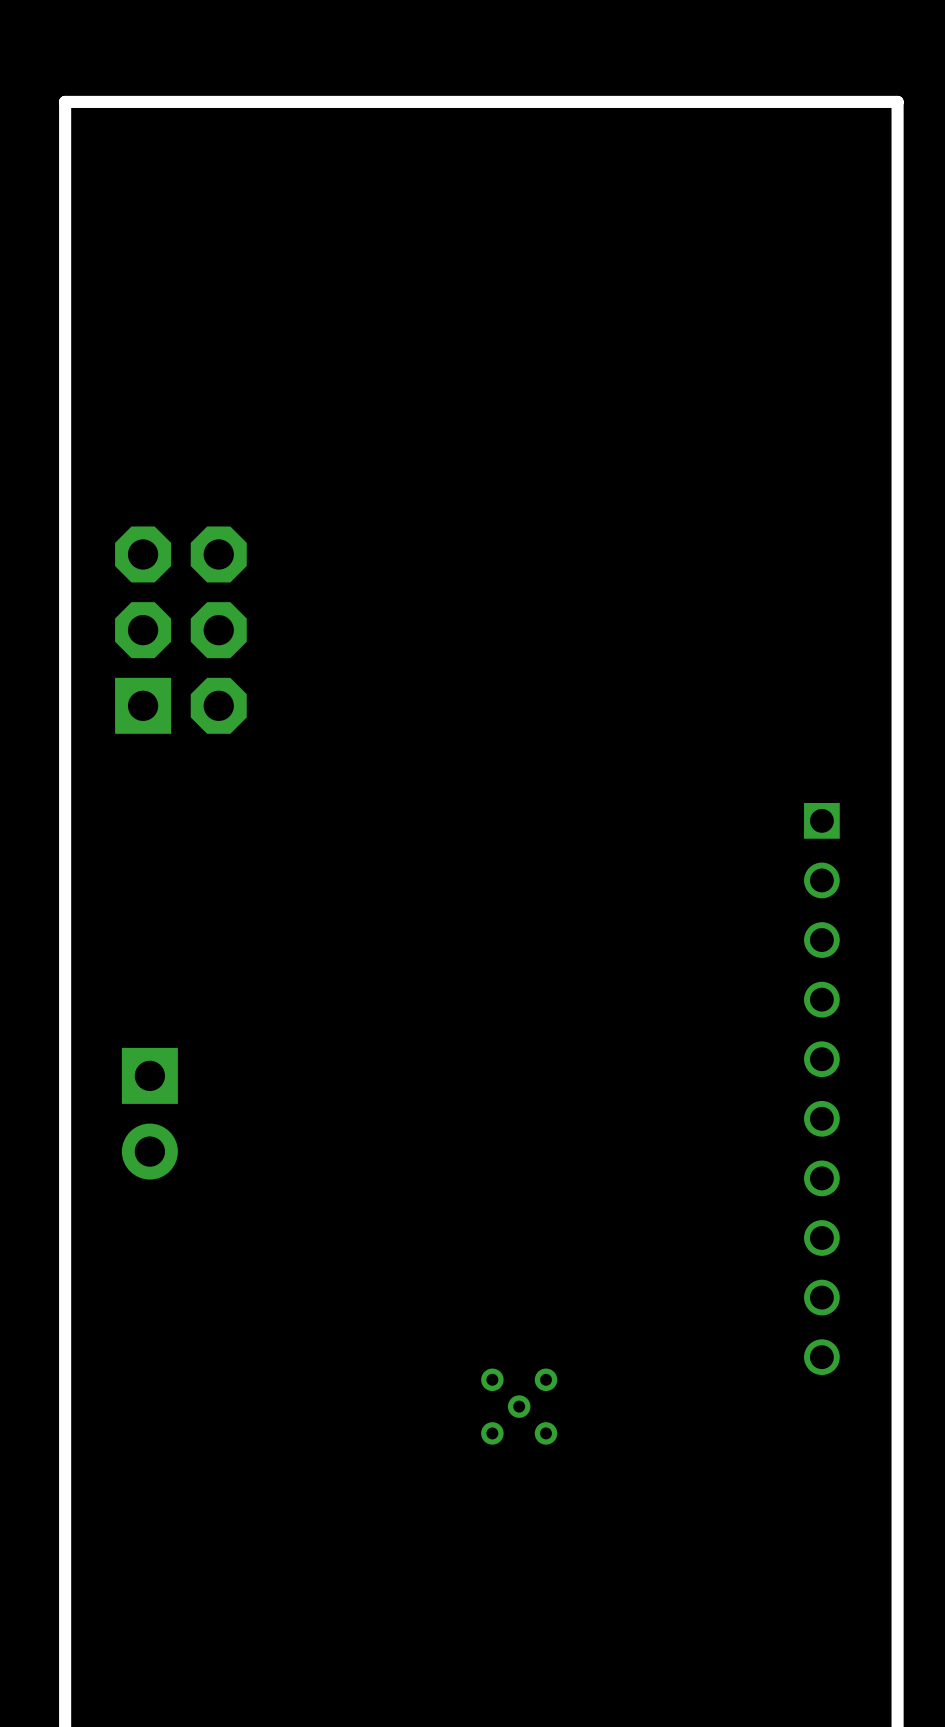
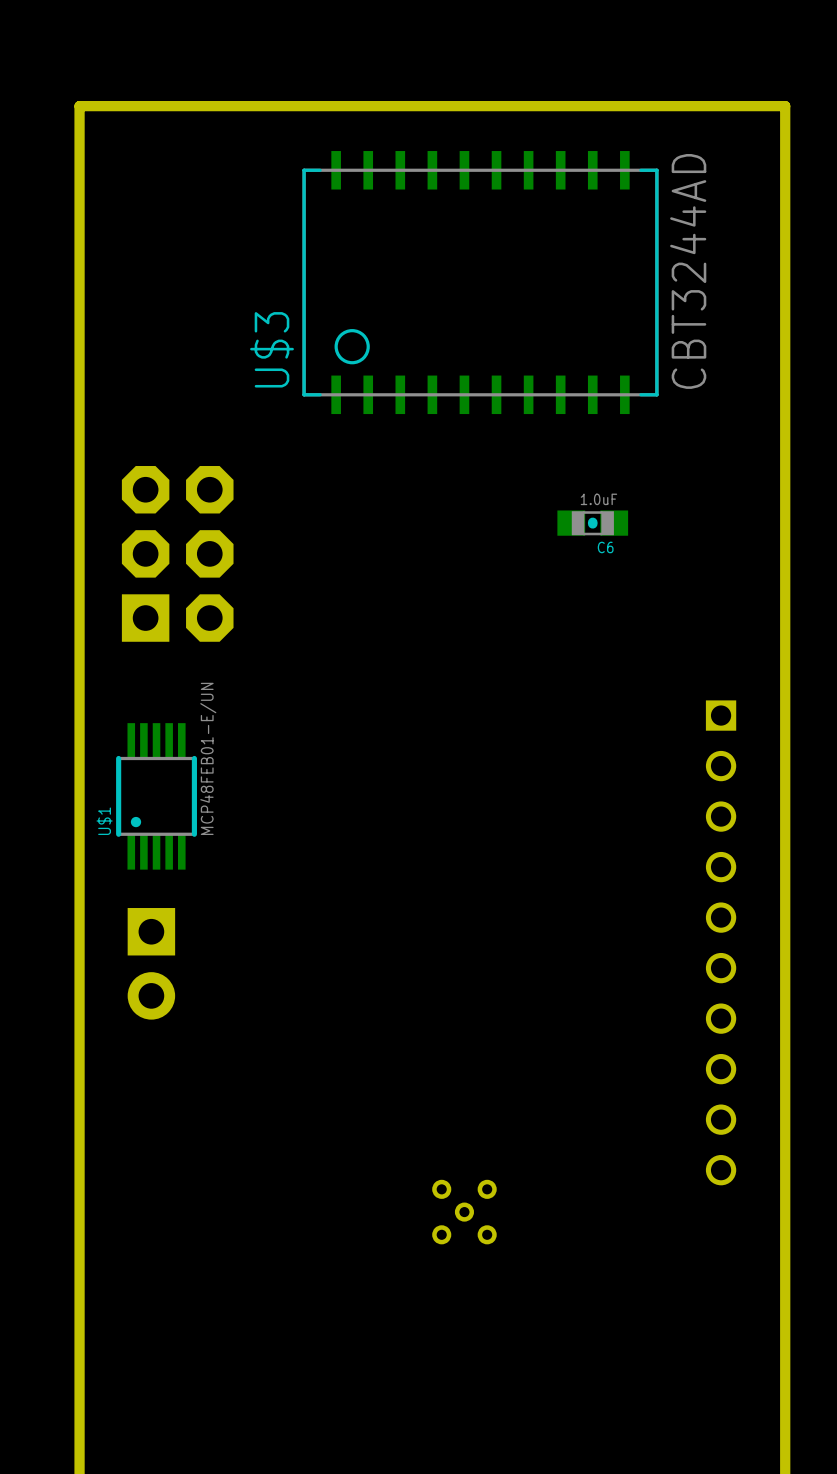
U$3: none -> CBT3244AD (480, 282)
C6: none -> 1.0uF (592, 523)
U$1: none -> MCP48FEB01-E/UN (156, 796)

